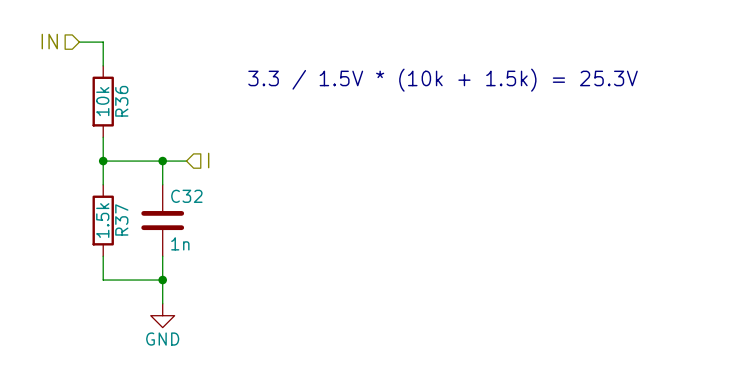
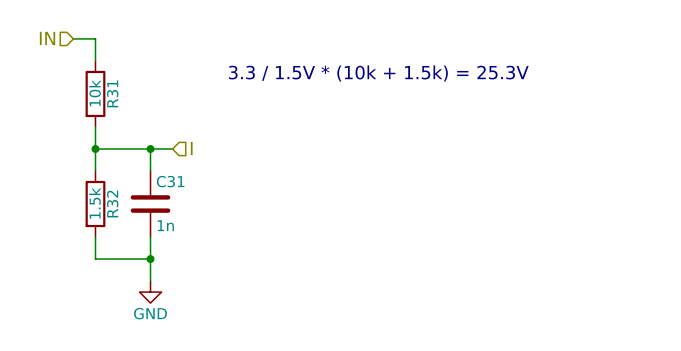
R36 name: R36 (121, 101) -> R31 (112, 93)
C32 name: C32 (186, 196) -> C31 (170, 181)
R37 name: R37 (121, 219) -> R32 (112, 204)

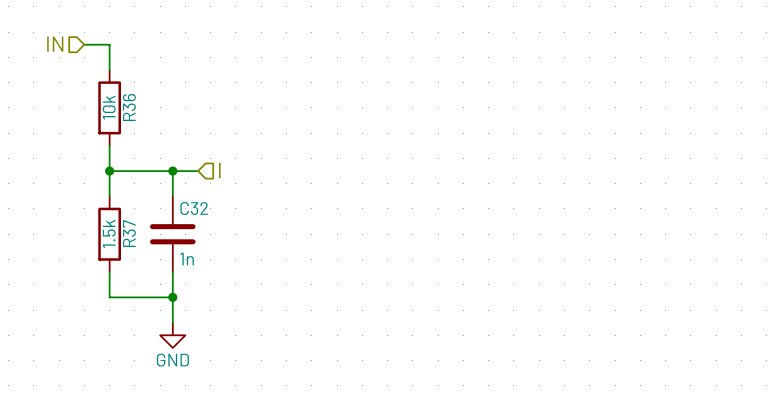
text: 3.3 / 1.5V * (10k + 1.5k) = 25.3V (378, 73) -> none
R31 name: R31 (112, 93) -> R36 (129, 107)
C31 name: C31 (170, 181) -> C32 (194, 208)
R32 name: R32 (112, 204) -> R37 (129, 233)

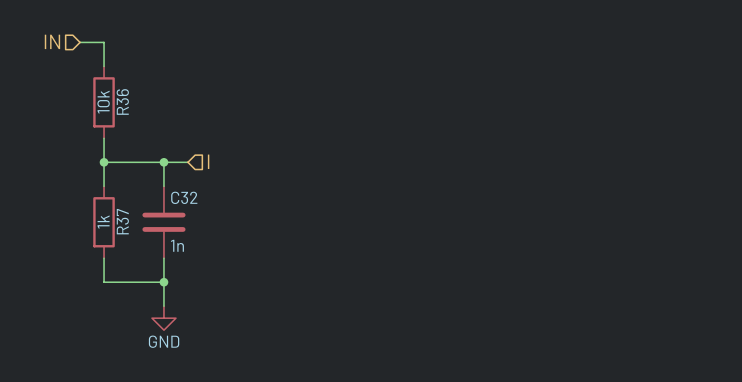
R37 value: 1.5k (109, 233) -> 1k (103, 222)

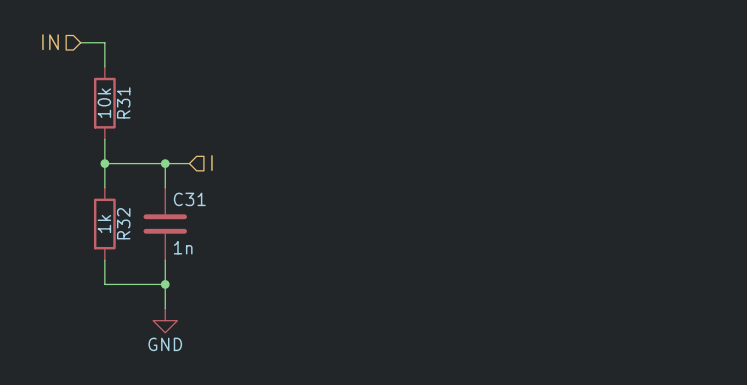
R36 name: R36 (122, 101) -> R31 (123, 102)
C32 name: C32 (184, 197) -> C31 (189, 199)
R37 name: R37 (122, 221) -> R32 (123, 223)

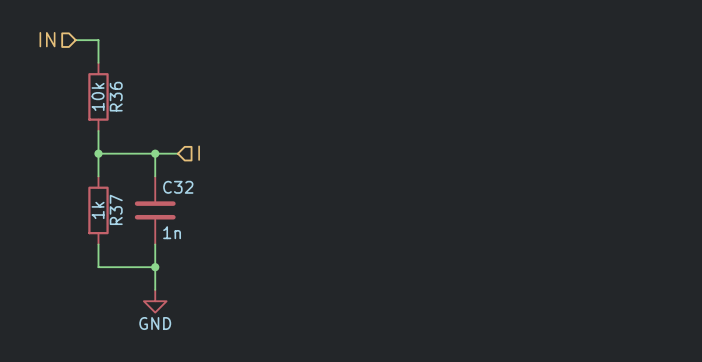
R31 name: R31 (123, 102) -> R36 (116, 96)
C31 name: C31 (189, 199) -> C32 (178, 187)
R32 name: R32 (123, 223) -> R37 (116, 209)

